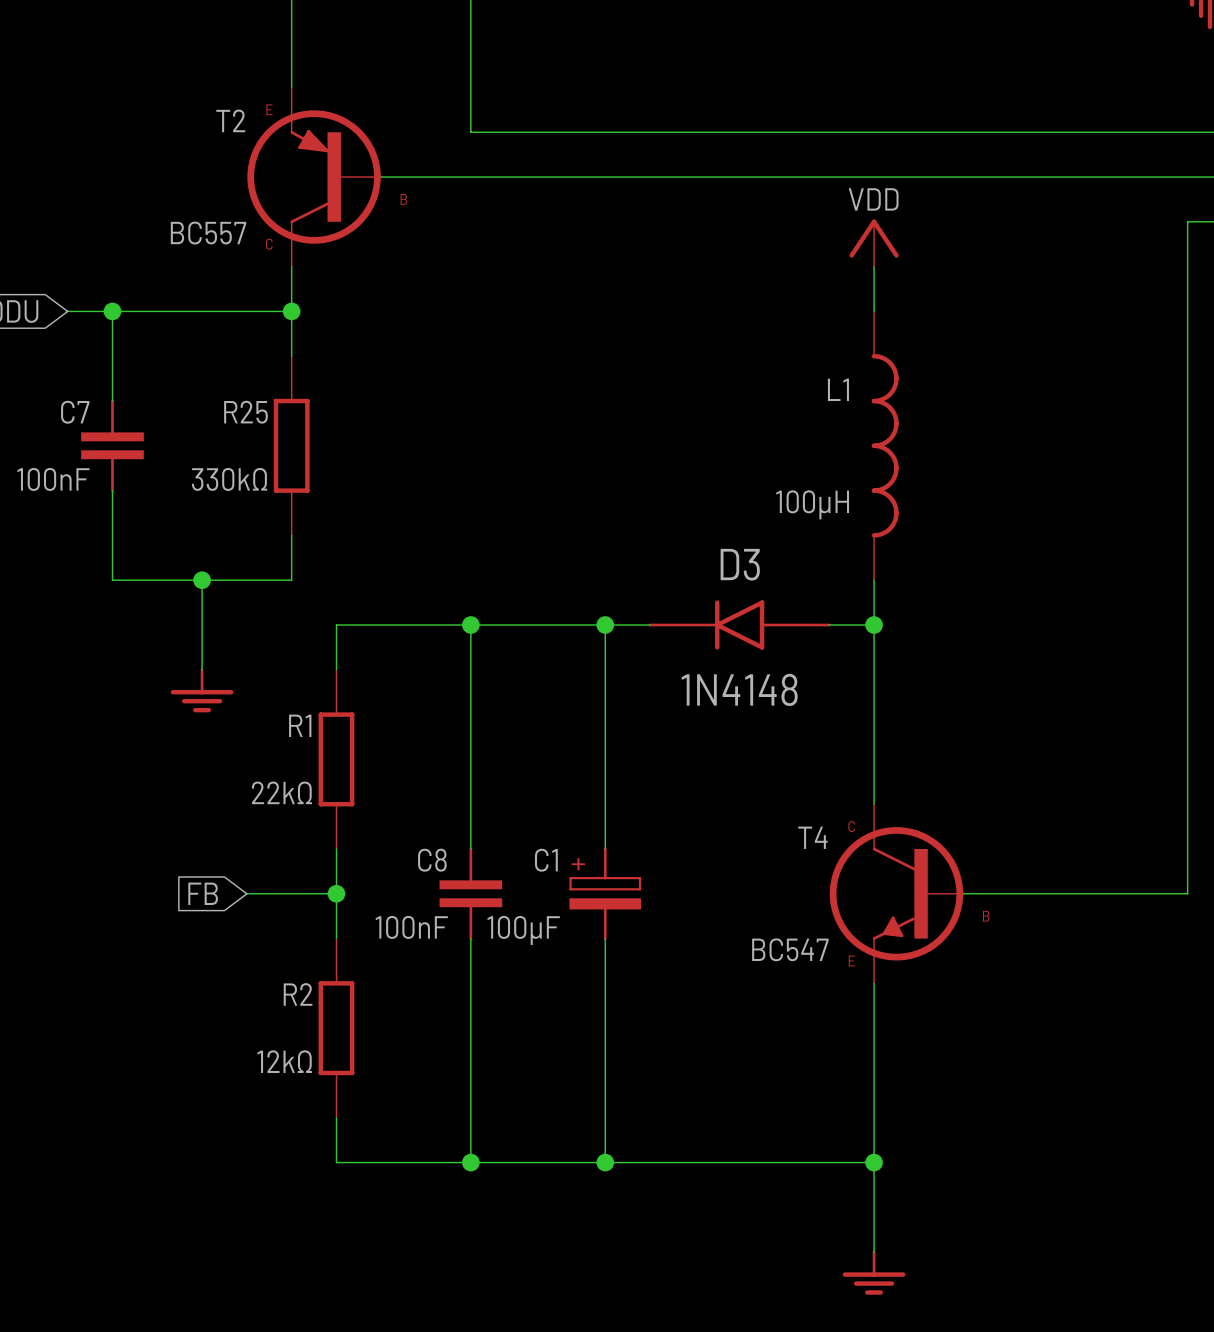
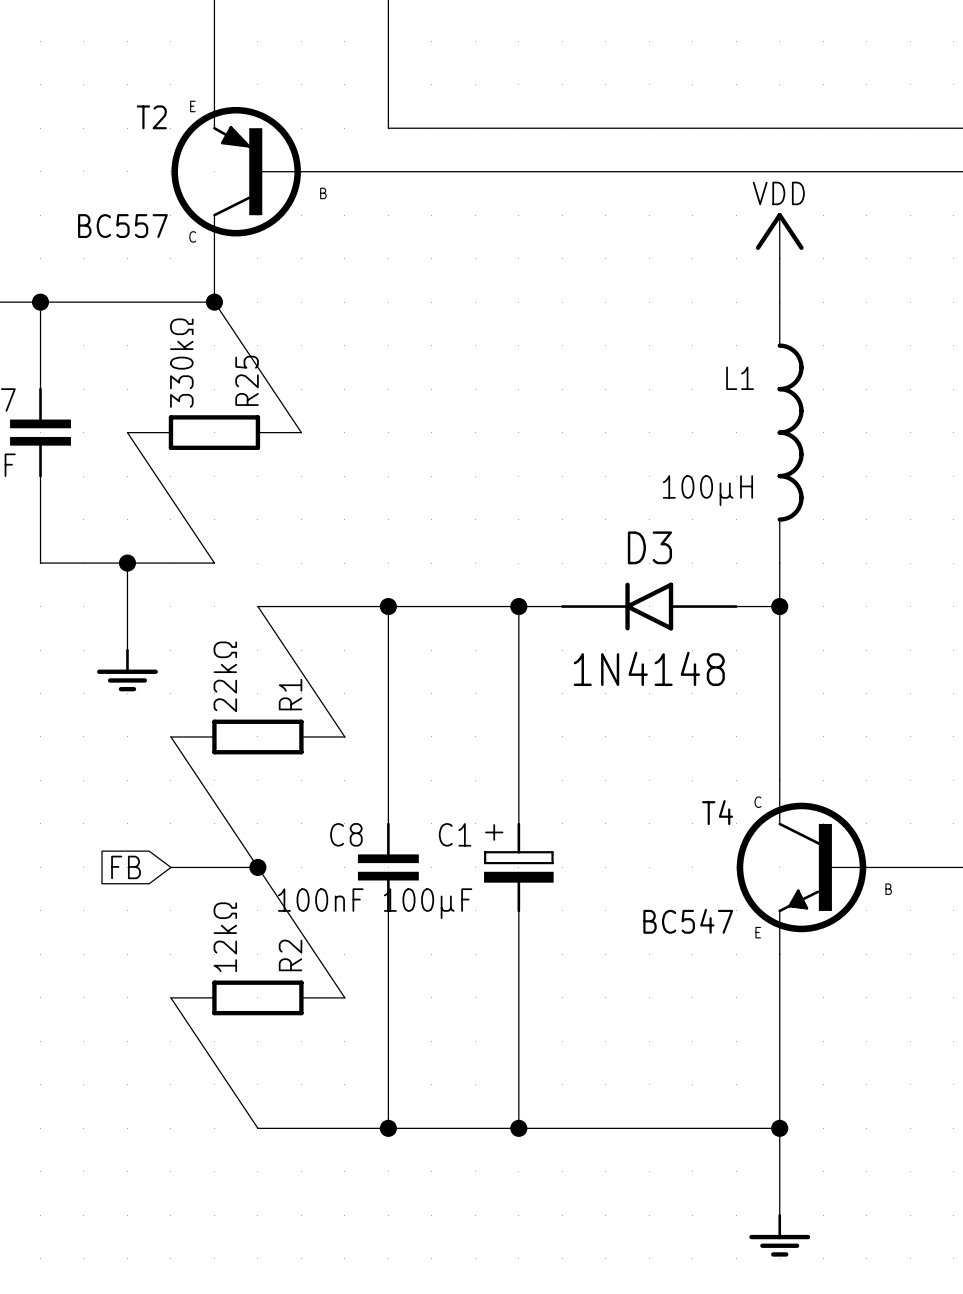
wire: (291, 311) (291, 356) -> (214, 302) (301, 432)
R25 rotation: 0° (291, 445) -> 90° clockwise (214, 432)
wire: (291, 535) (291, 580) -> (127, 432) (214, 563)
wire: (336, 625) (336, 669) -> (257, 606) (344, 736)
wire: none -> (170, 736) (344, 997)
R1 rotation: 0° (336, 759) -> 90° clockwise (257, 736)
wire: (336, 848) (336, 938) -> none
R2 rotation: 0° (336, 1028) -> 90° clockwise (257, 997)
wire: (336, 1117) (336, 1162) -> (170, 997) (257, 1128)

